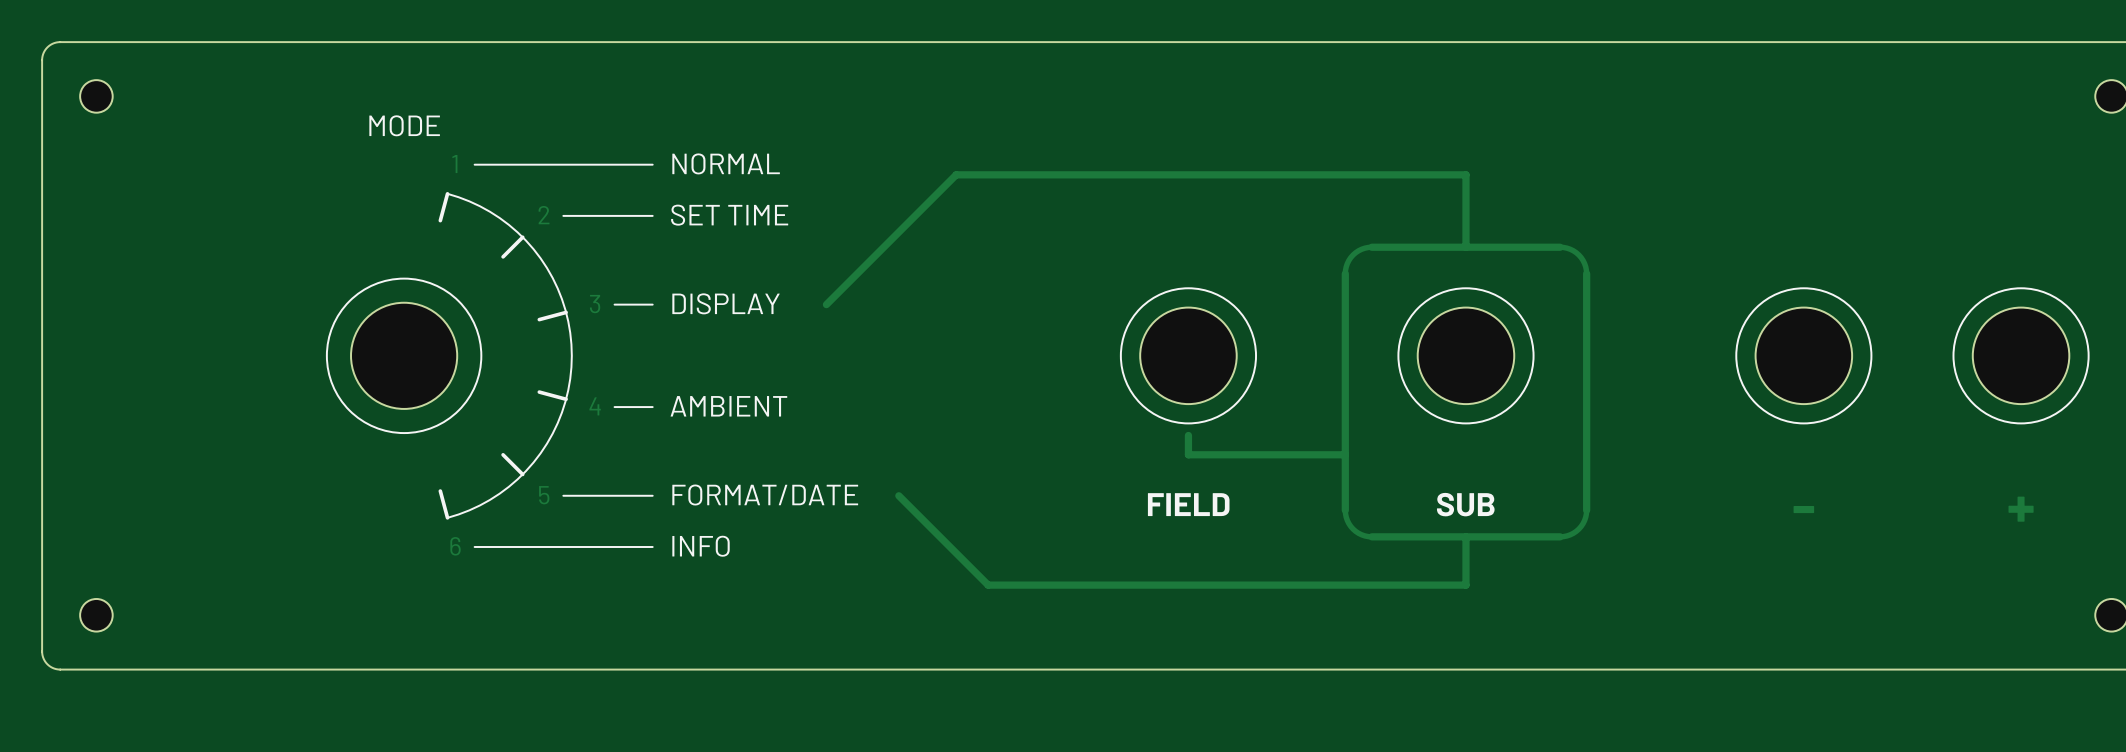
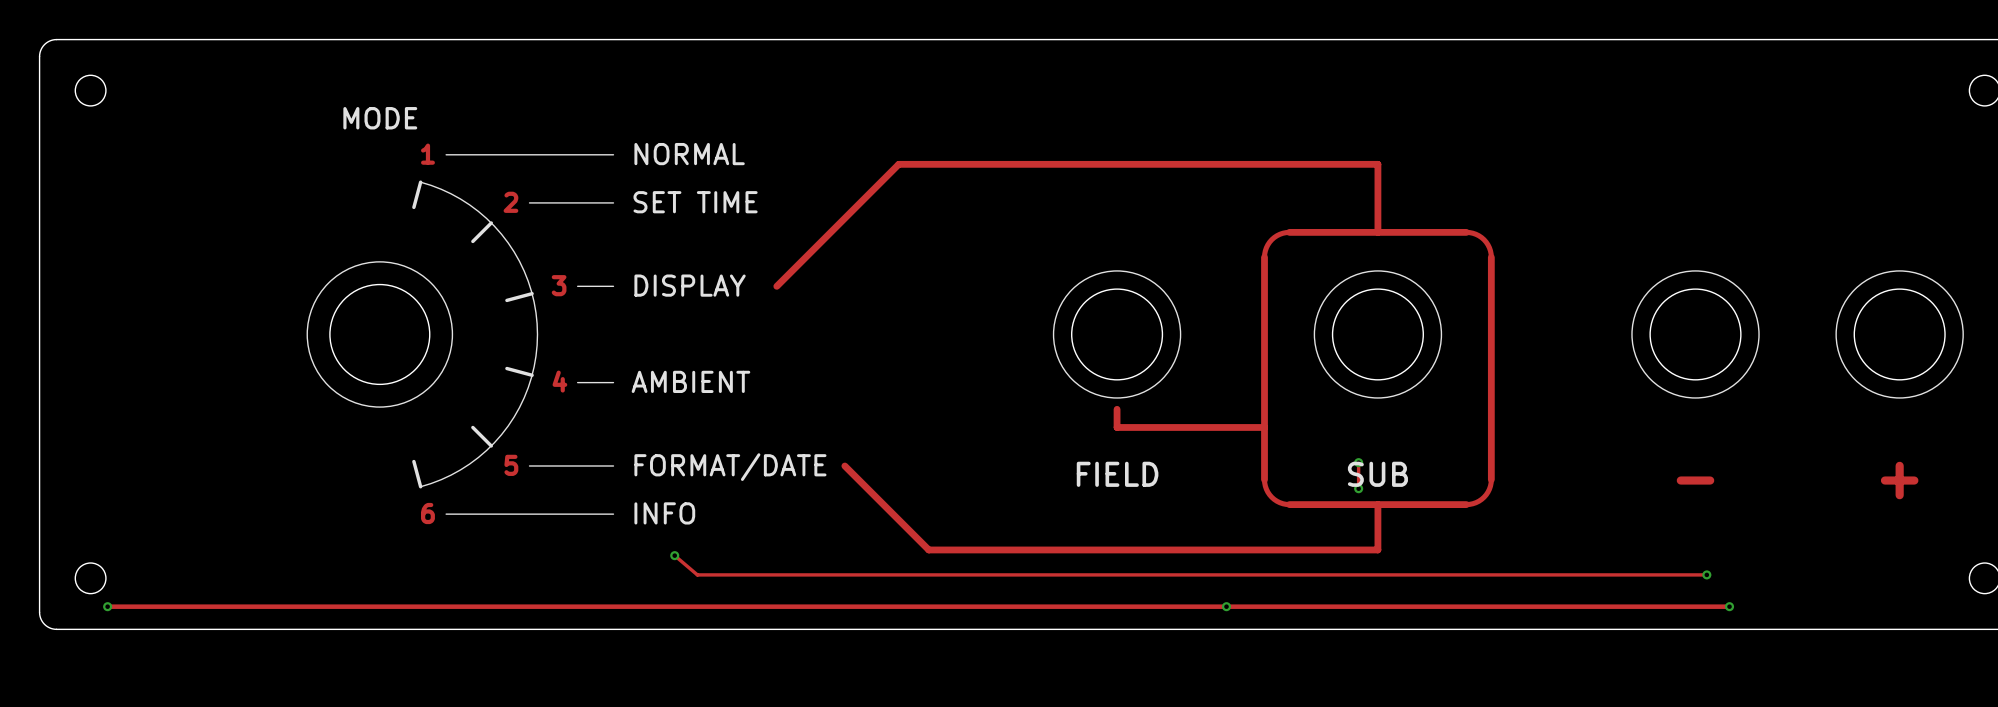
track: none -> (1358, 462) (1358, 488)
via: none -> (1358, 462)
via: none -> (1358, 488)
track: none -> (674, 555) (697, 574) (1706, 574)
via: none -> (674, 555)
via: none -> (1706, 574)
track: none -> (107, 606) (1729, 606)
via: none -> (107, 606)
via: none -> (1226, 606)
via: none -> (1729, 606)

